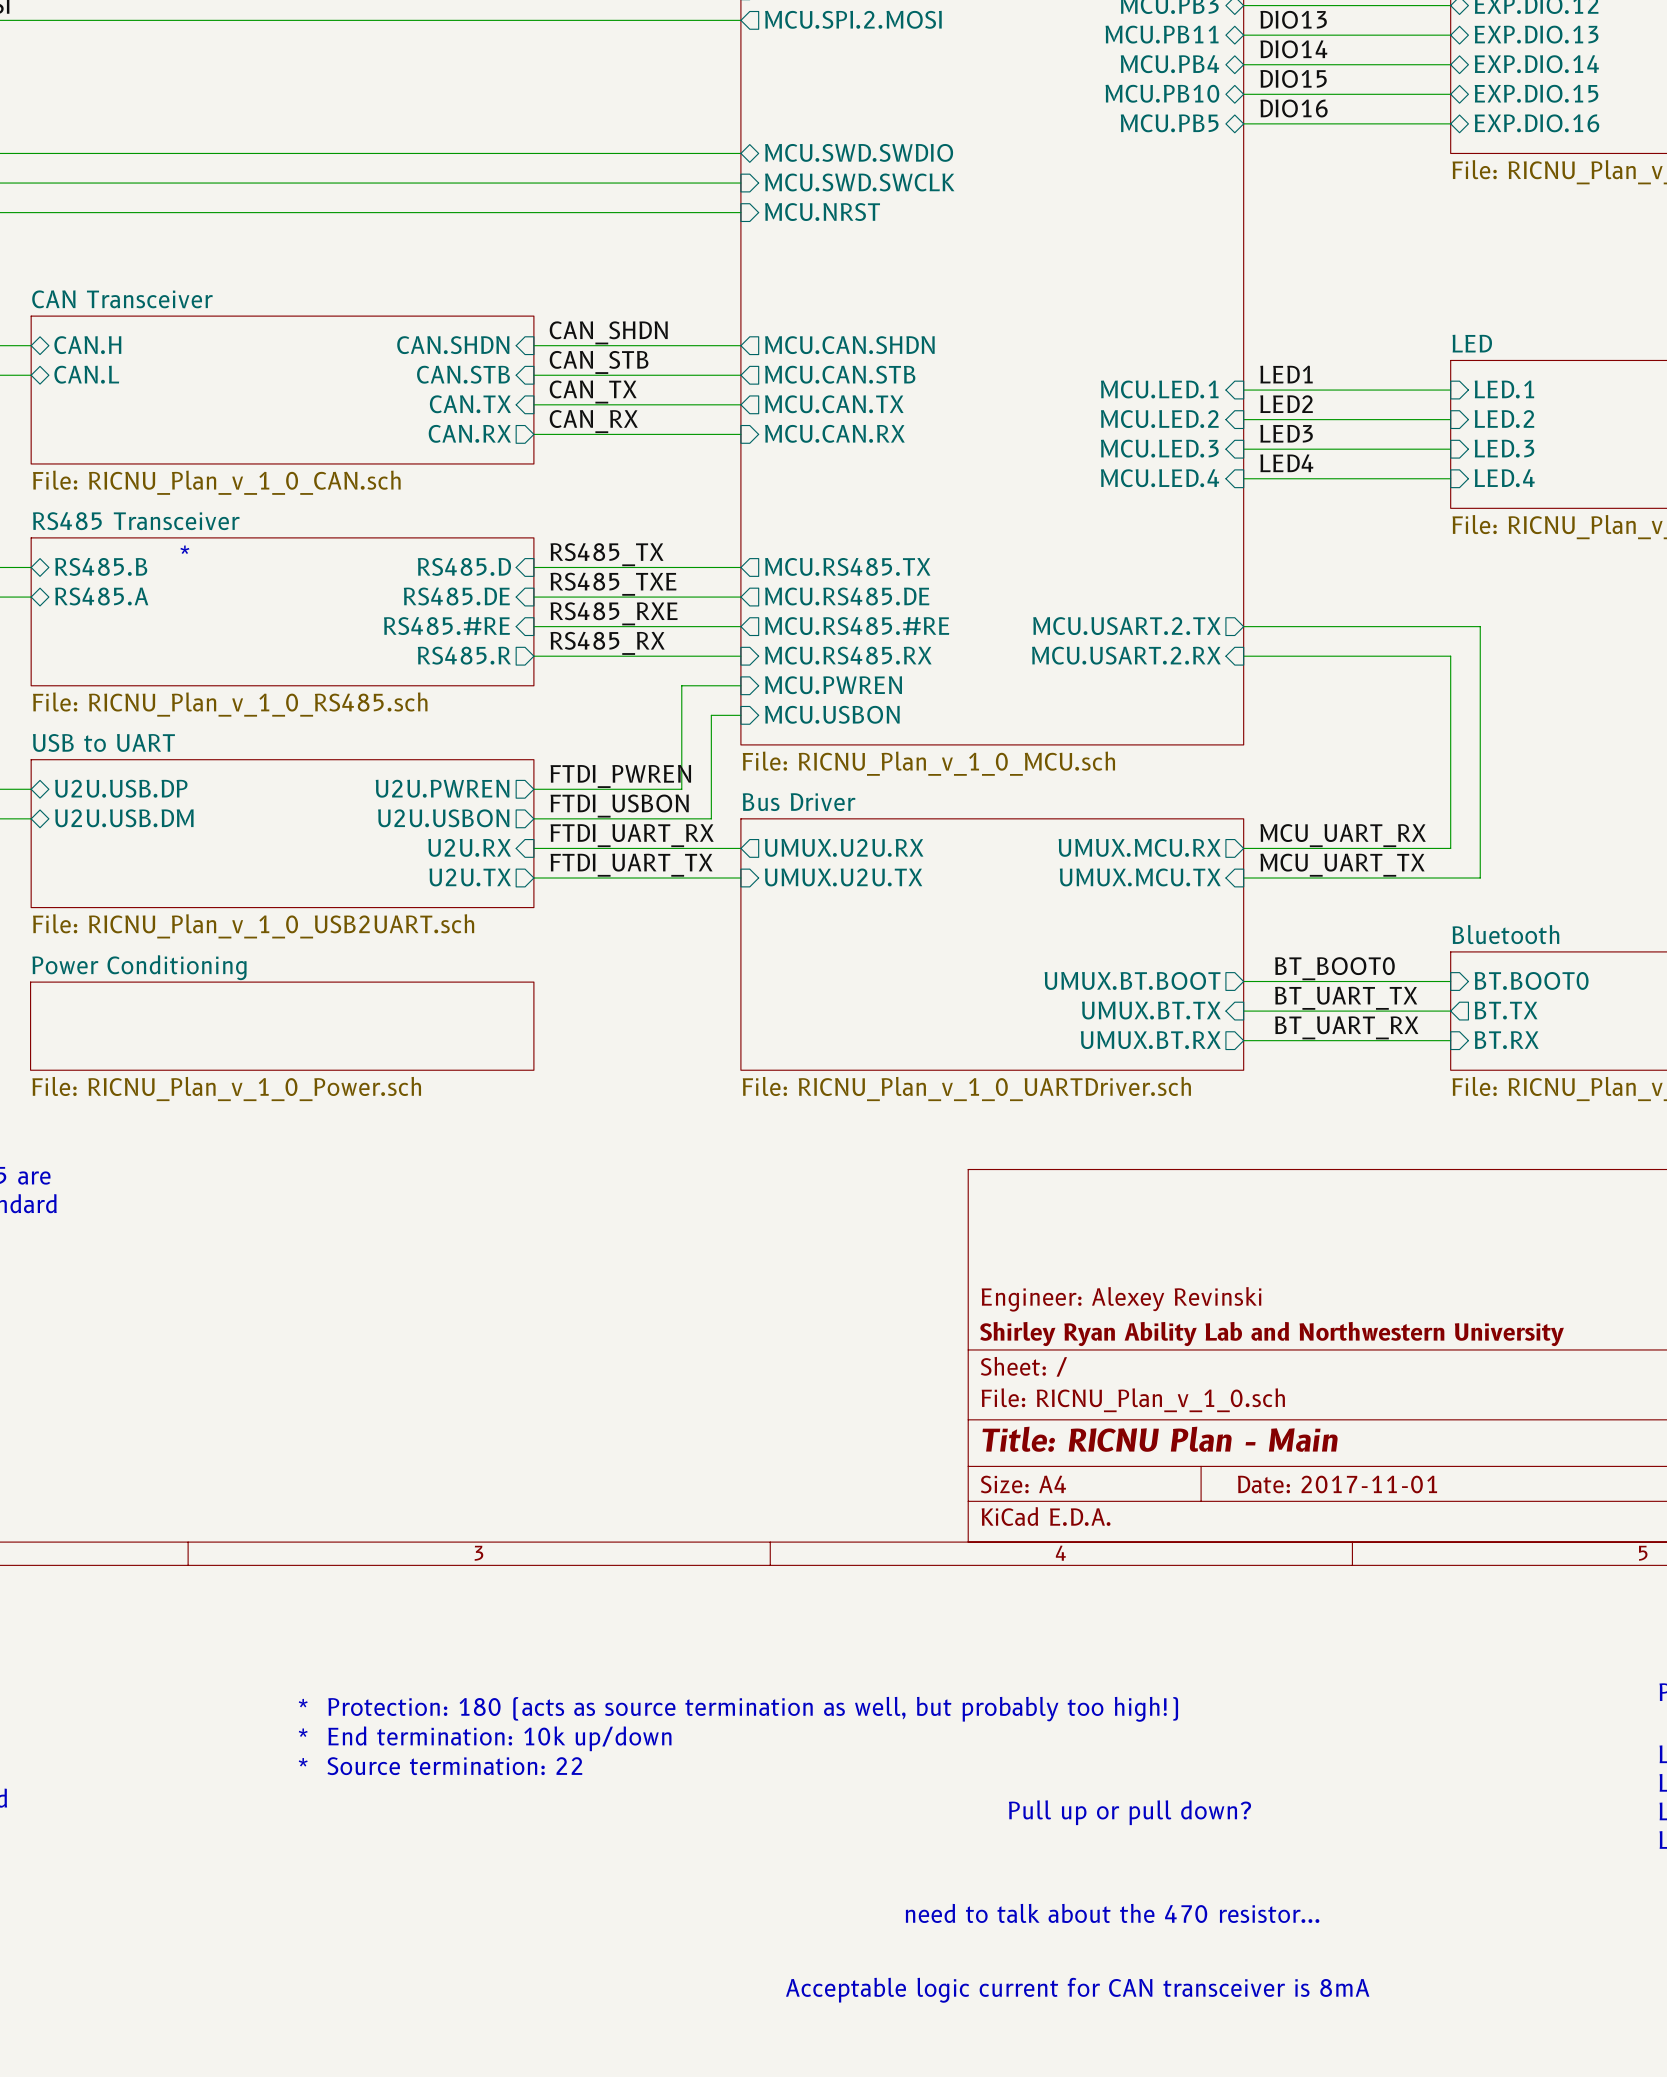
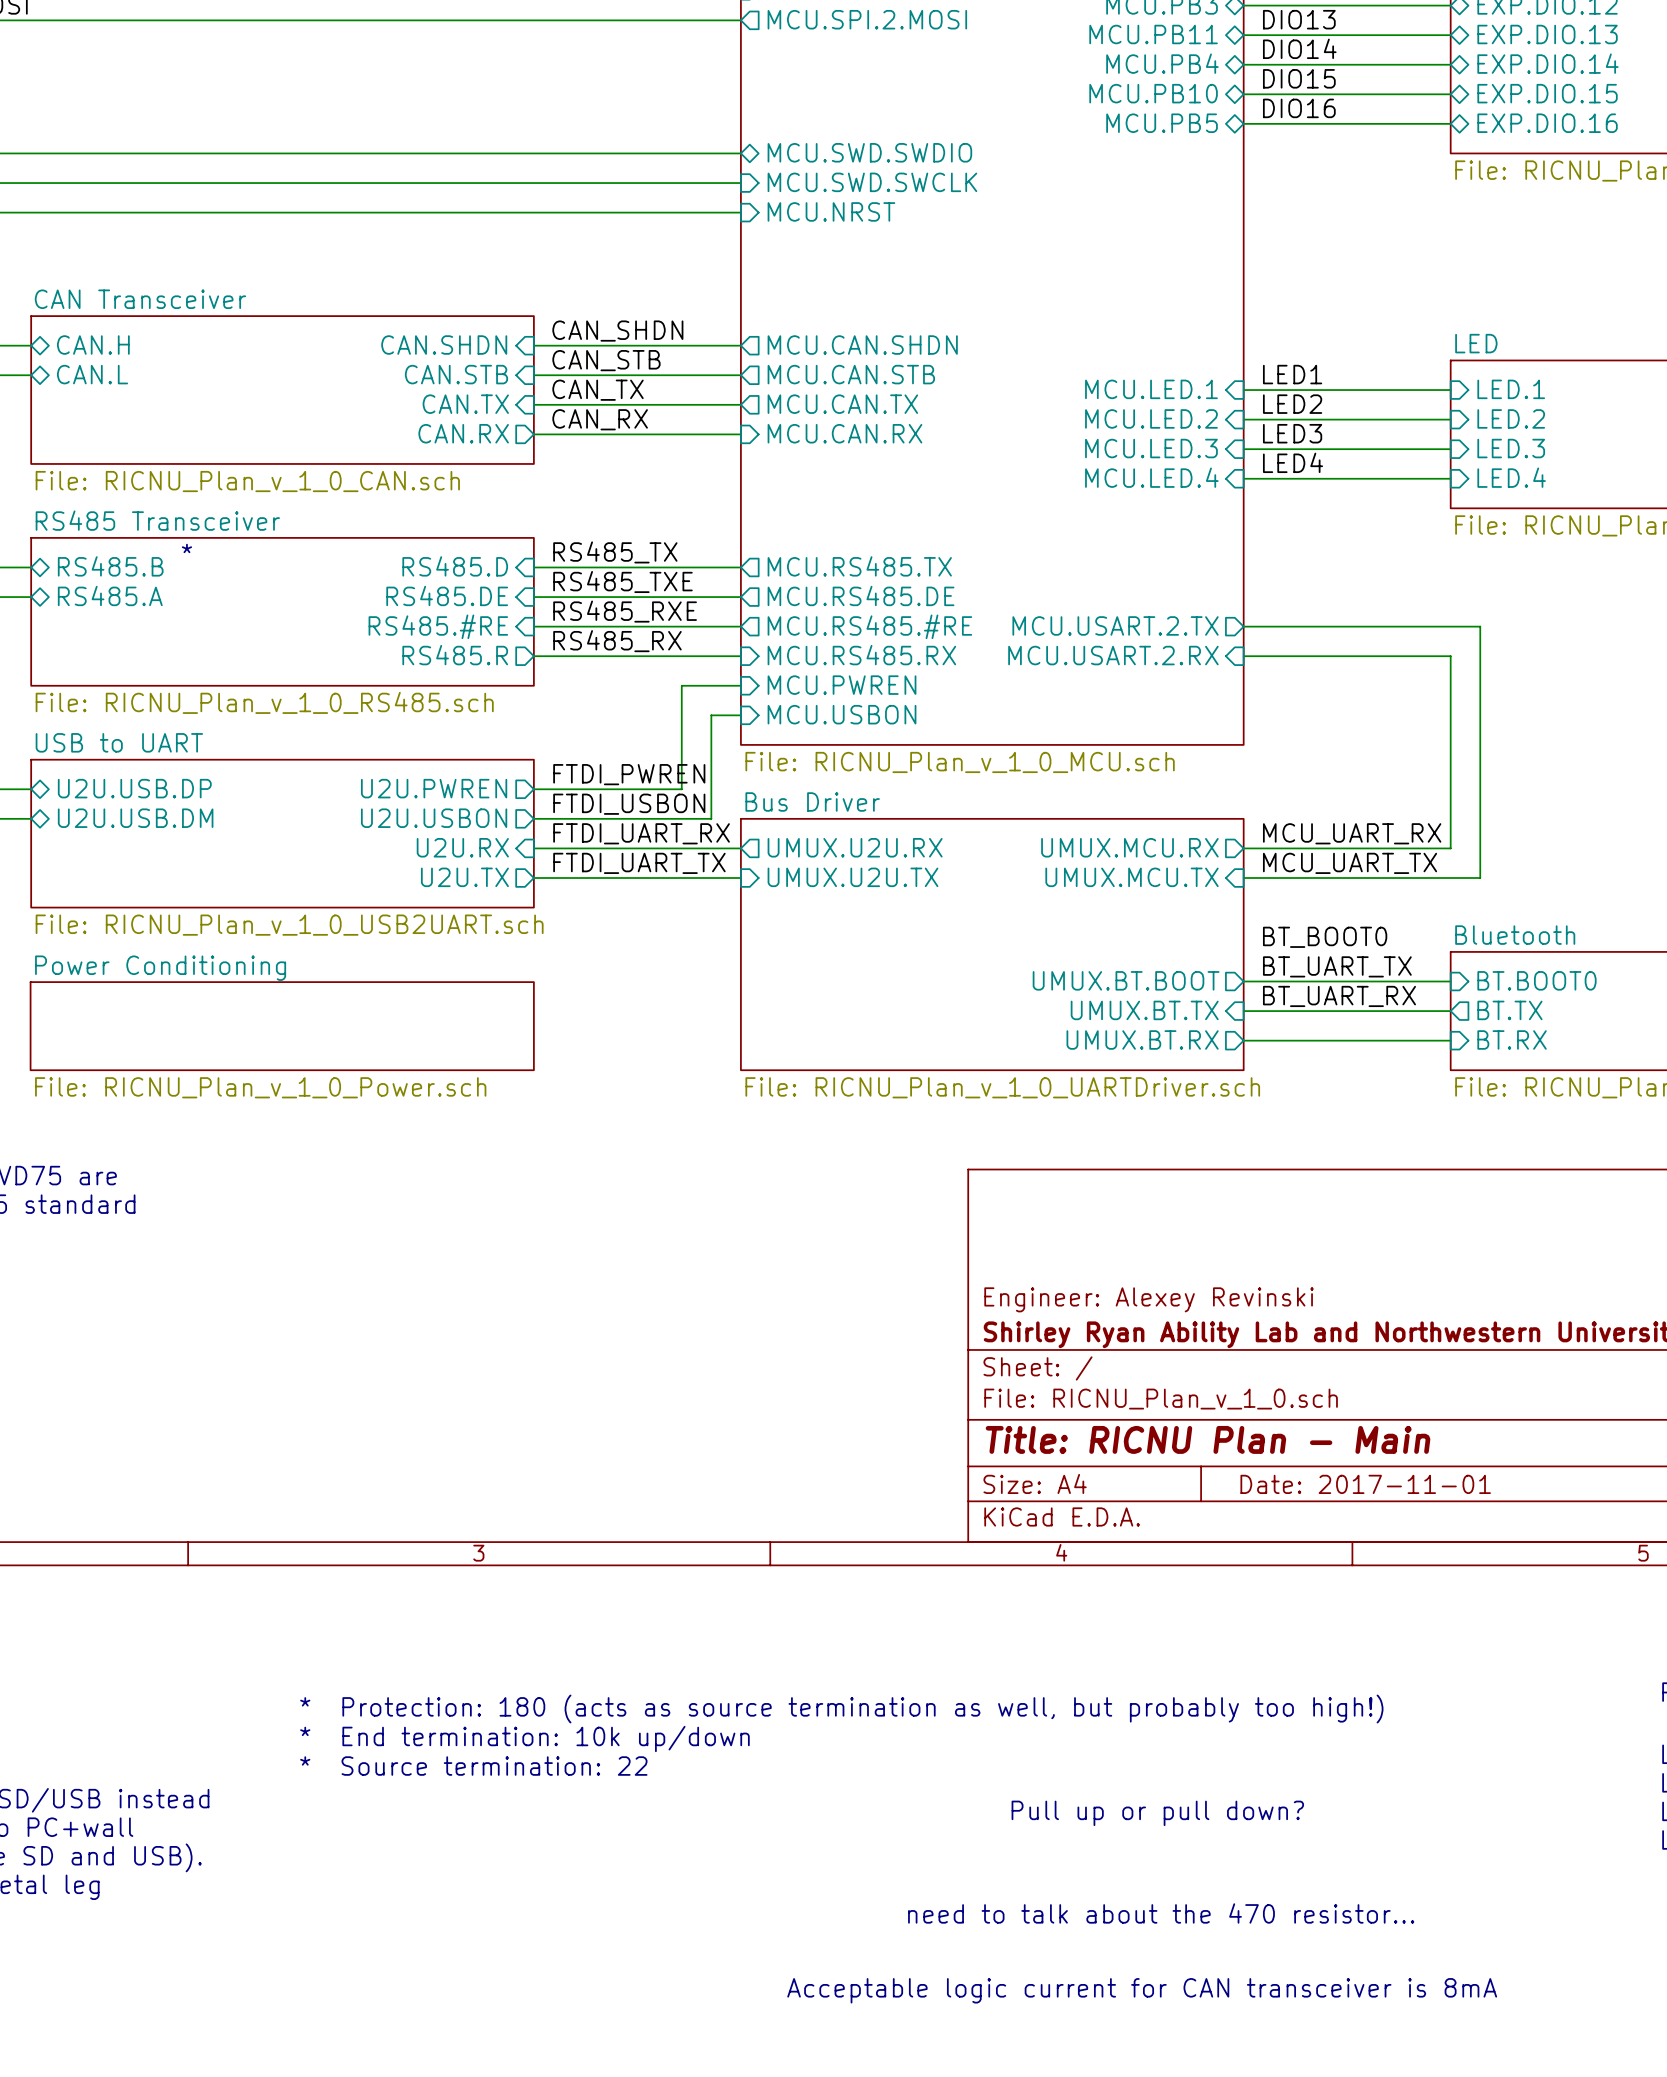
label position: BT_BOOT0 (1334, 968) -> BT_BOOT0 (1325, 937)
label position: BT_UART_TX (1346, 998) -> BT_UART_TX (1337, 966)
label position: BT_UART_RX (1346, 1027) -> BT_UART_RX (1339, 996)

